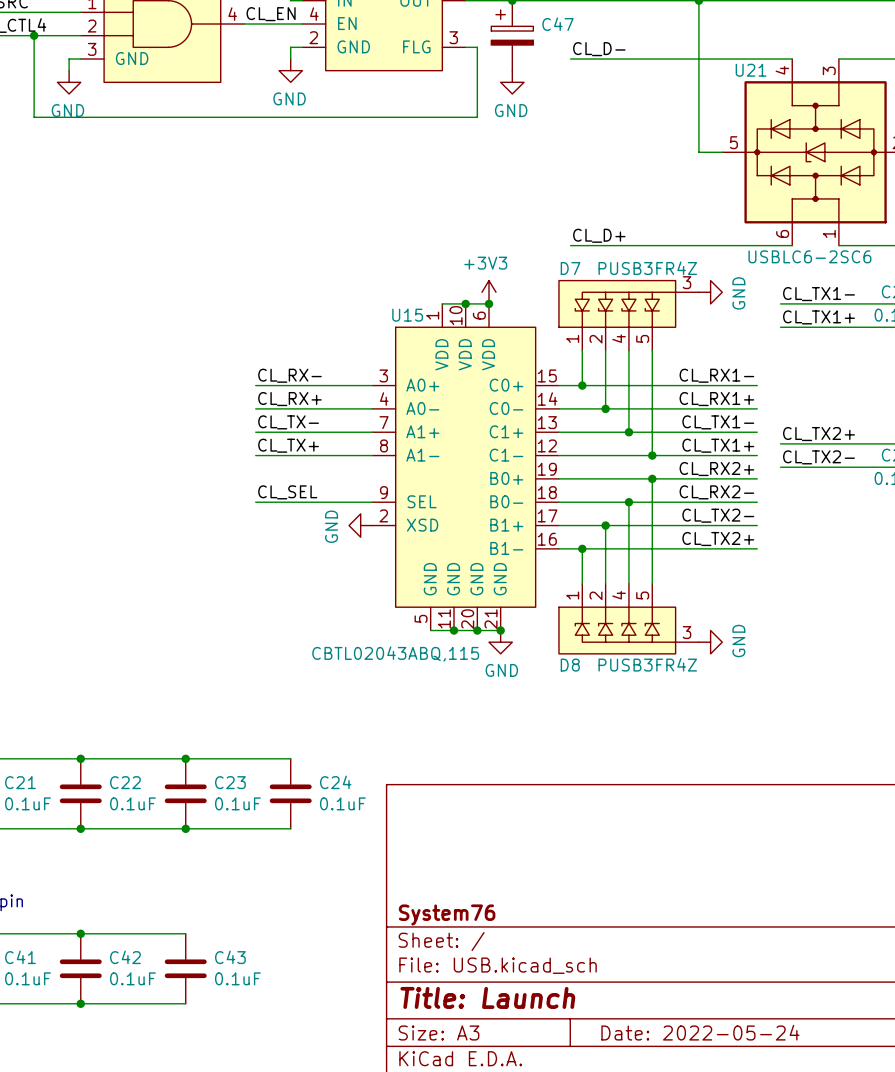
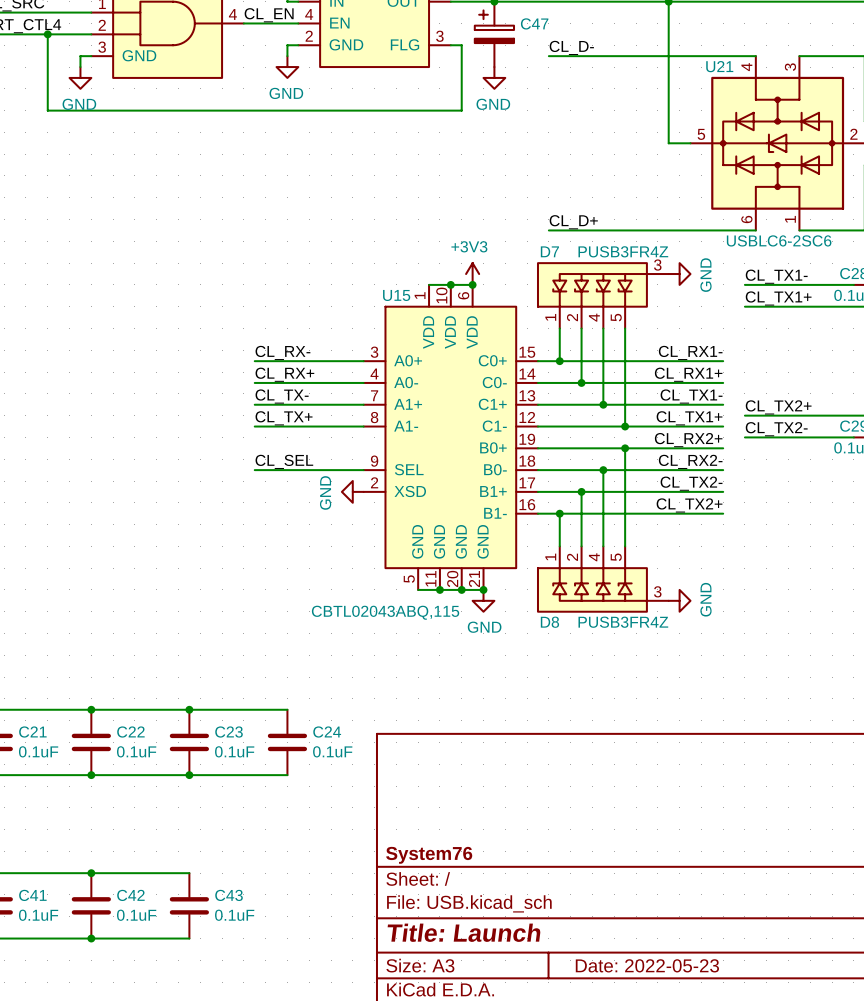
title block: Date: 2022-05-24 (700, 1032) -> Date: 2022-05-23 (647, 965)

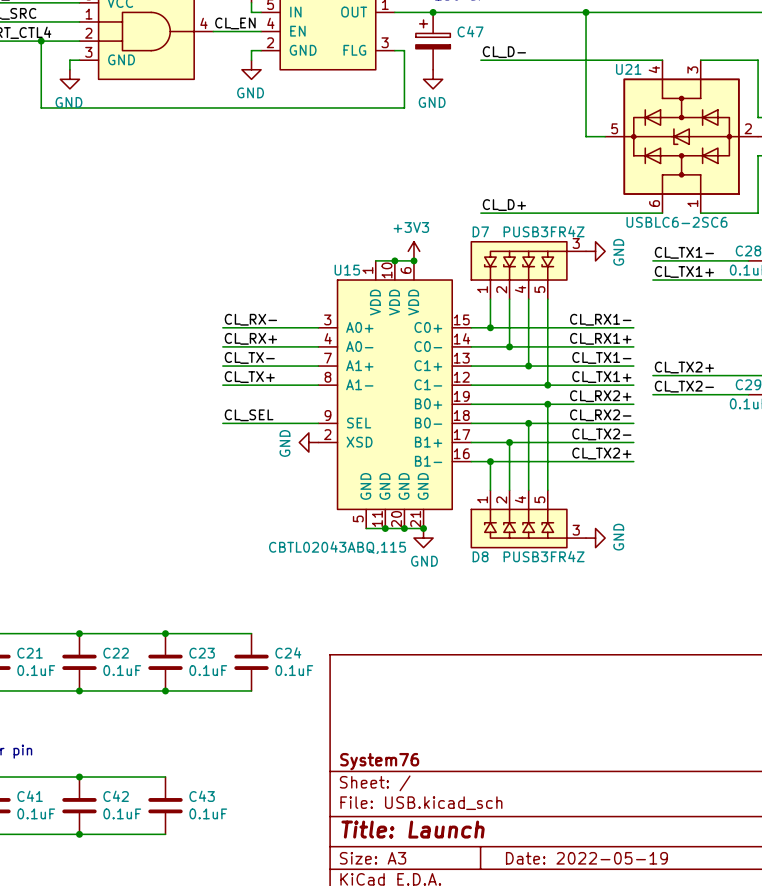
title block: Date: 2022-05-23 (647, 965) -> Date: 2022-05-19 (586, 858)

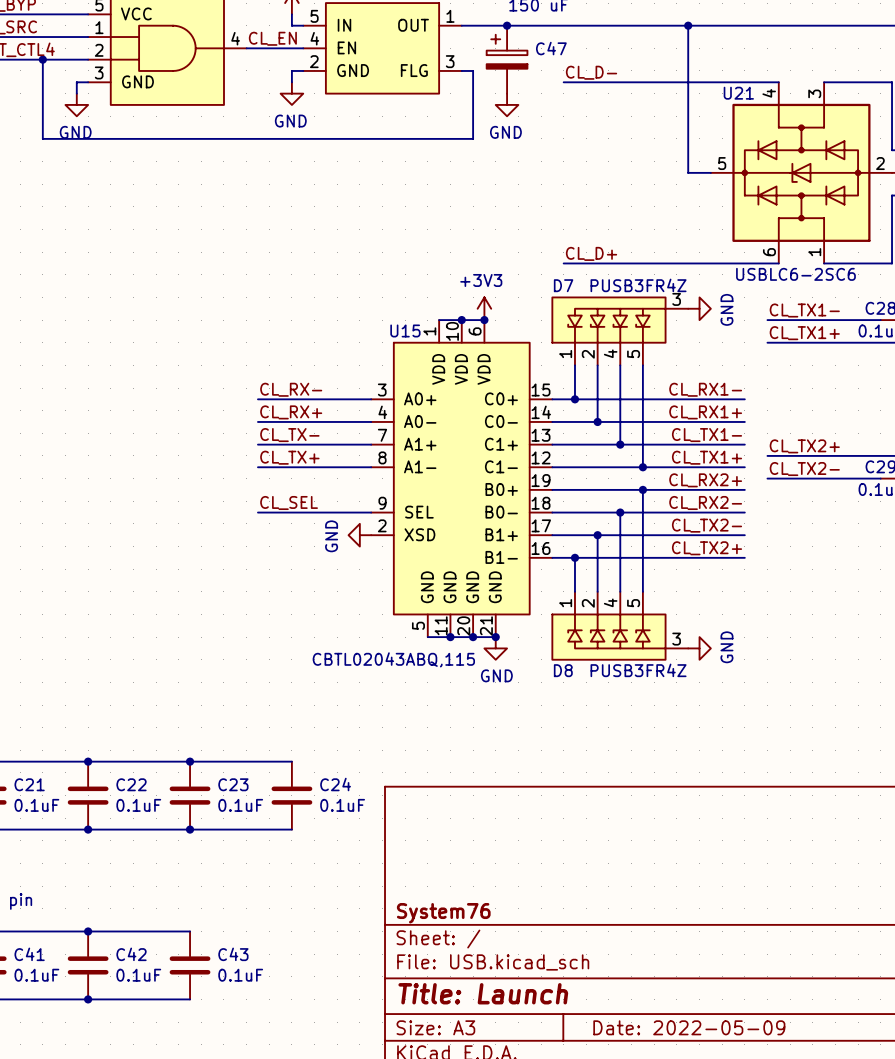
title block: Date: 2022-05-19 (586, 858) -> Date: 2022-05-09 (689, 1027)

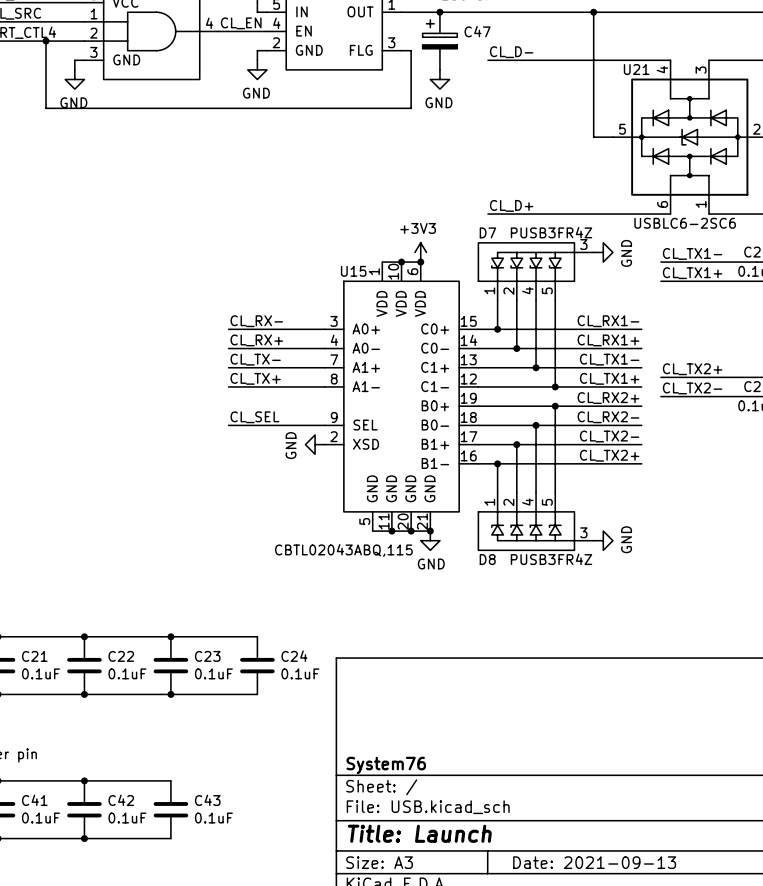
title block: Date: 2022-05-09 (689, 1027) -> Date: 2021-09-13 (594, 862)

